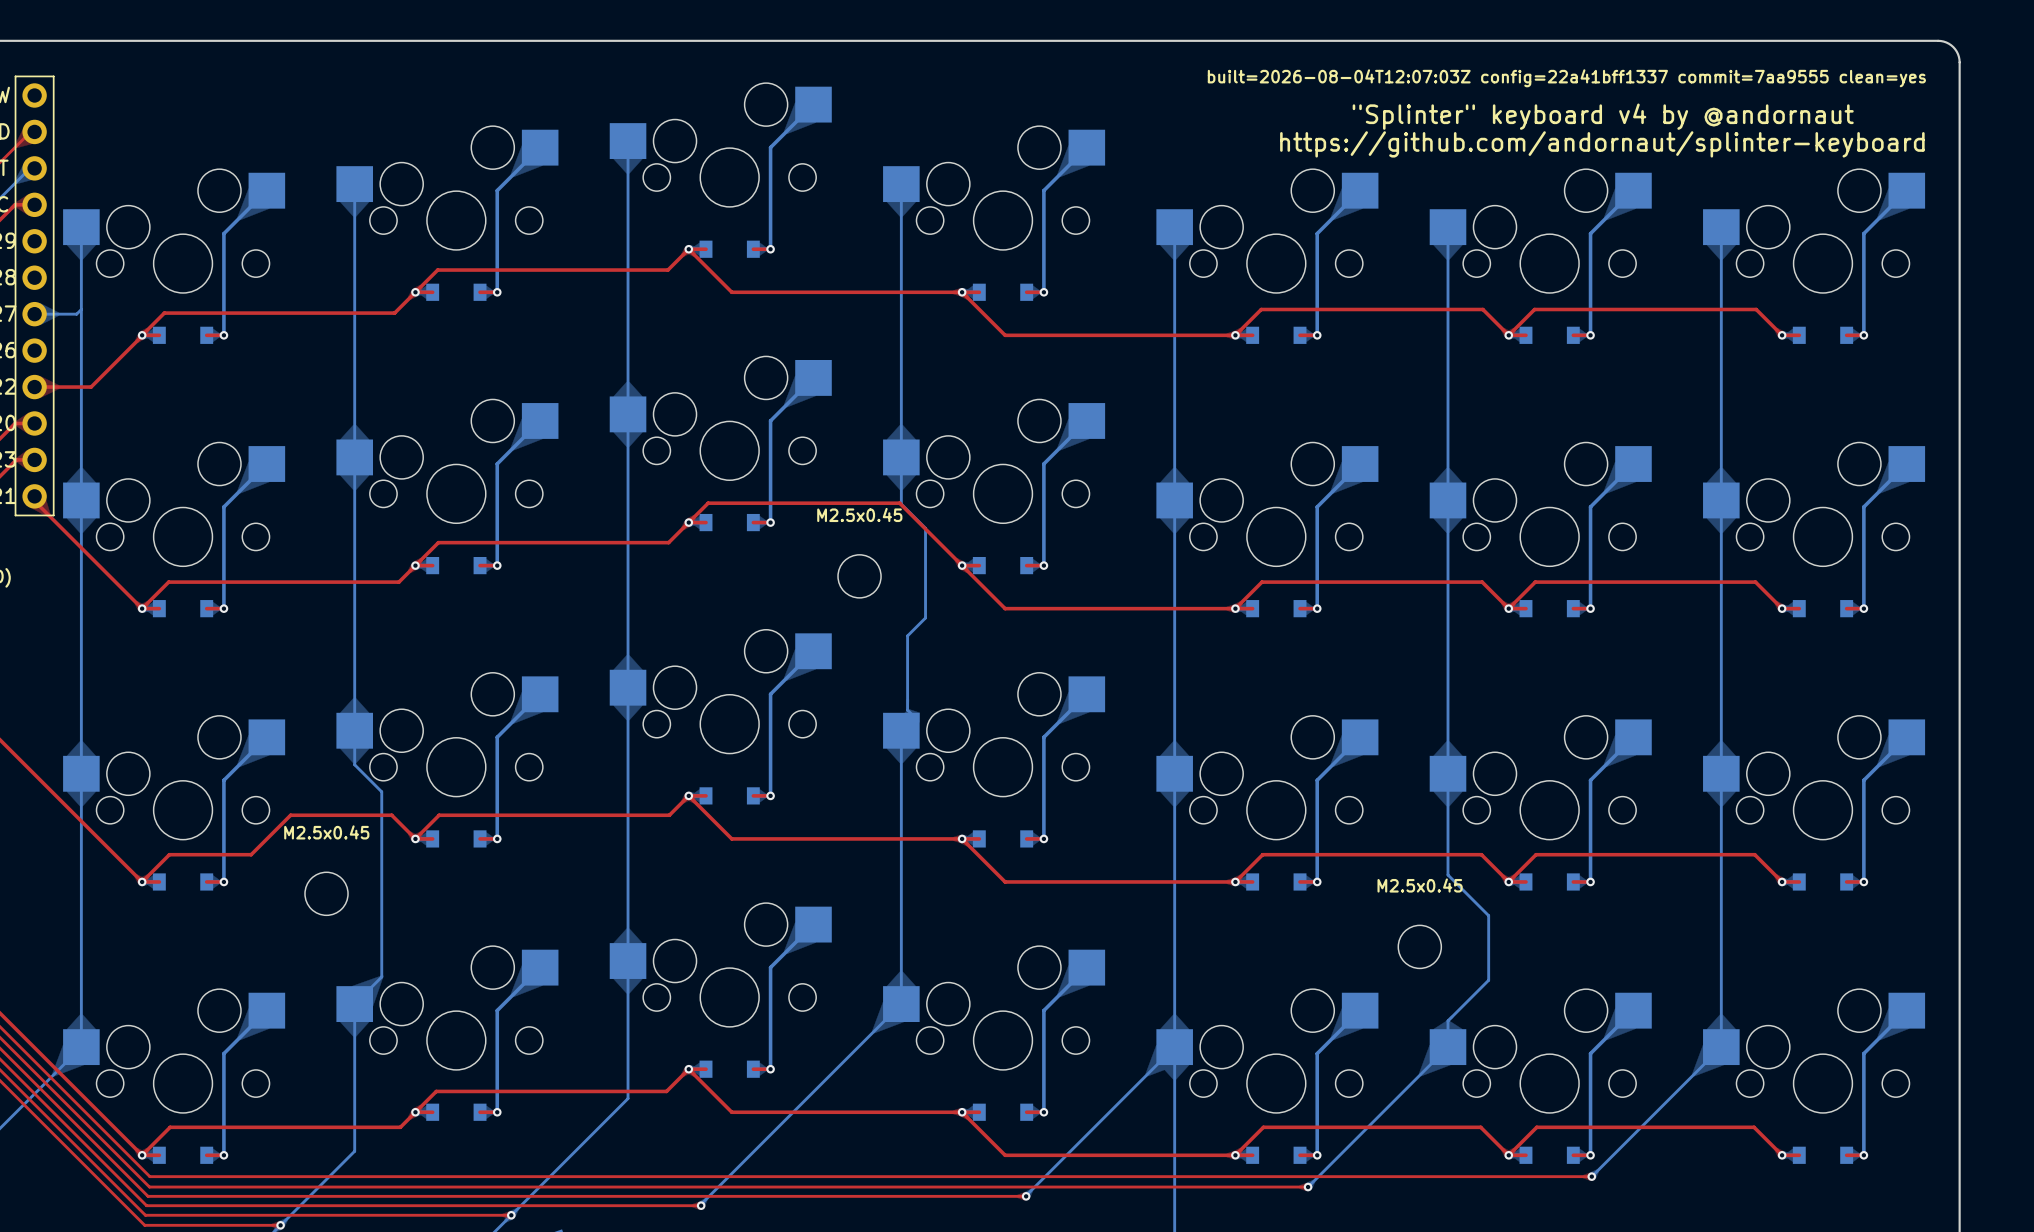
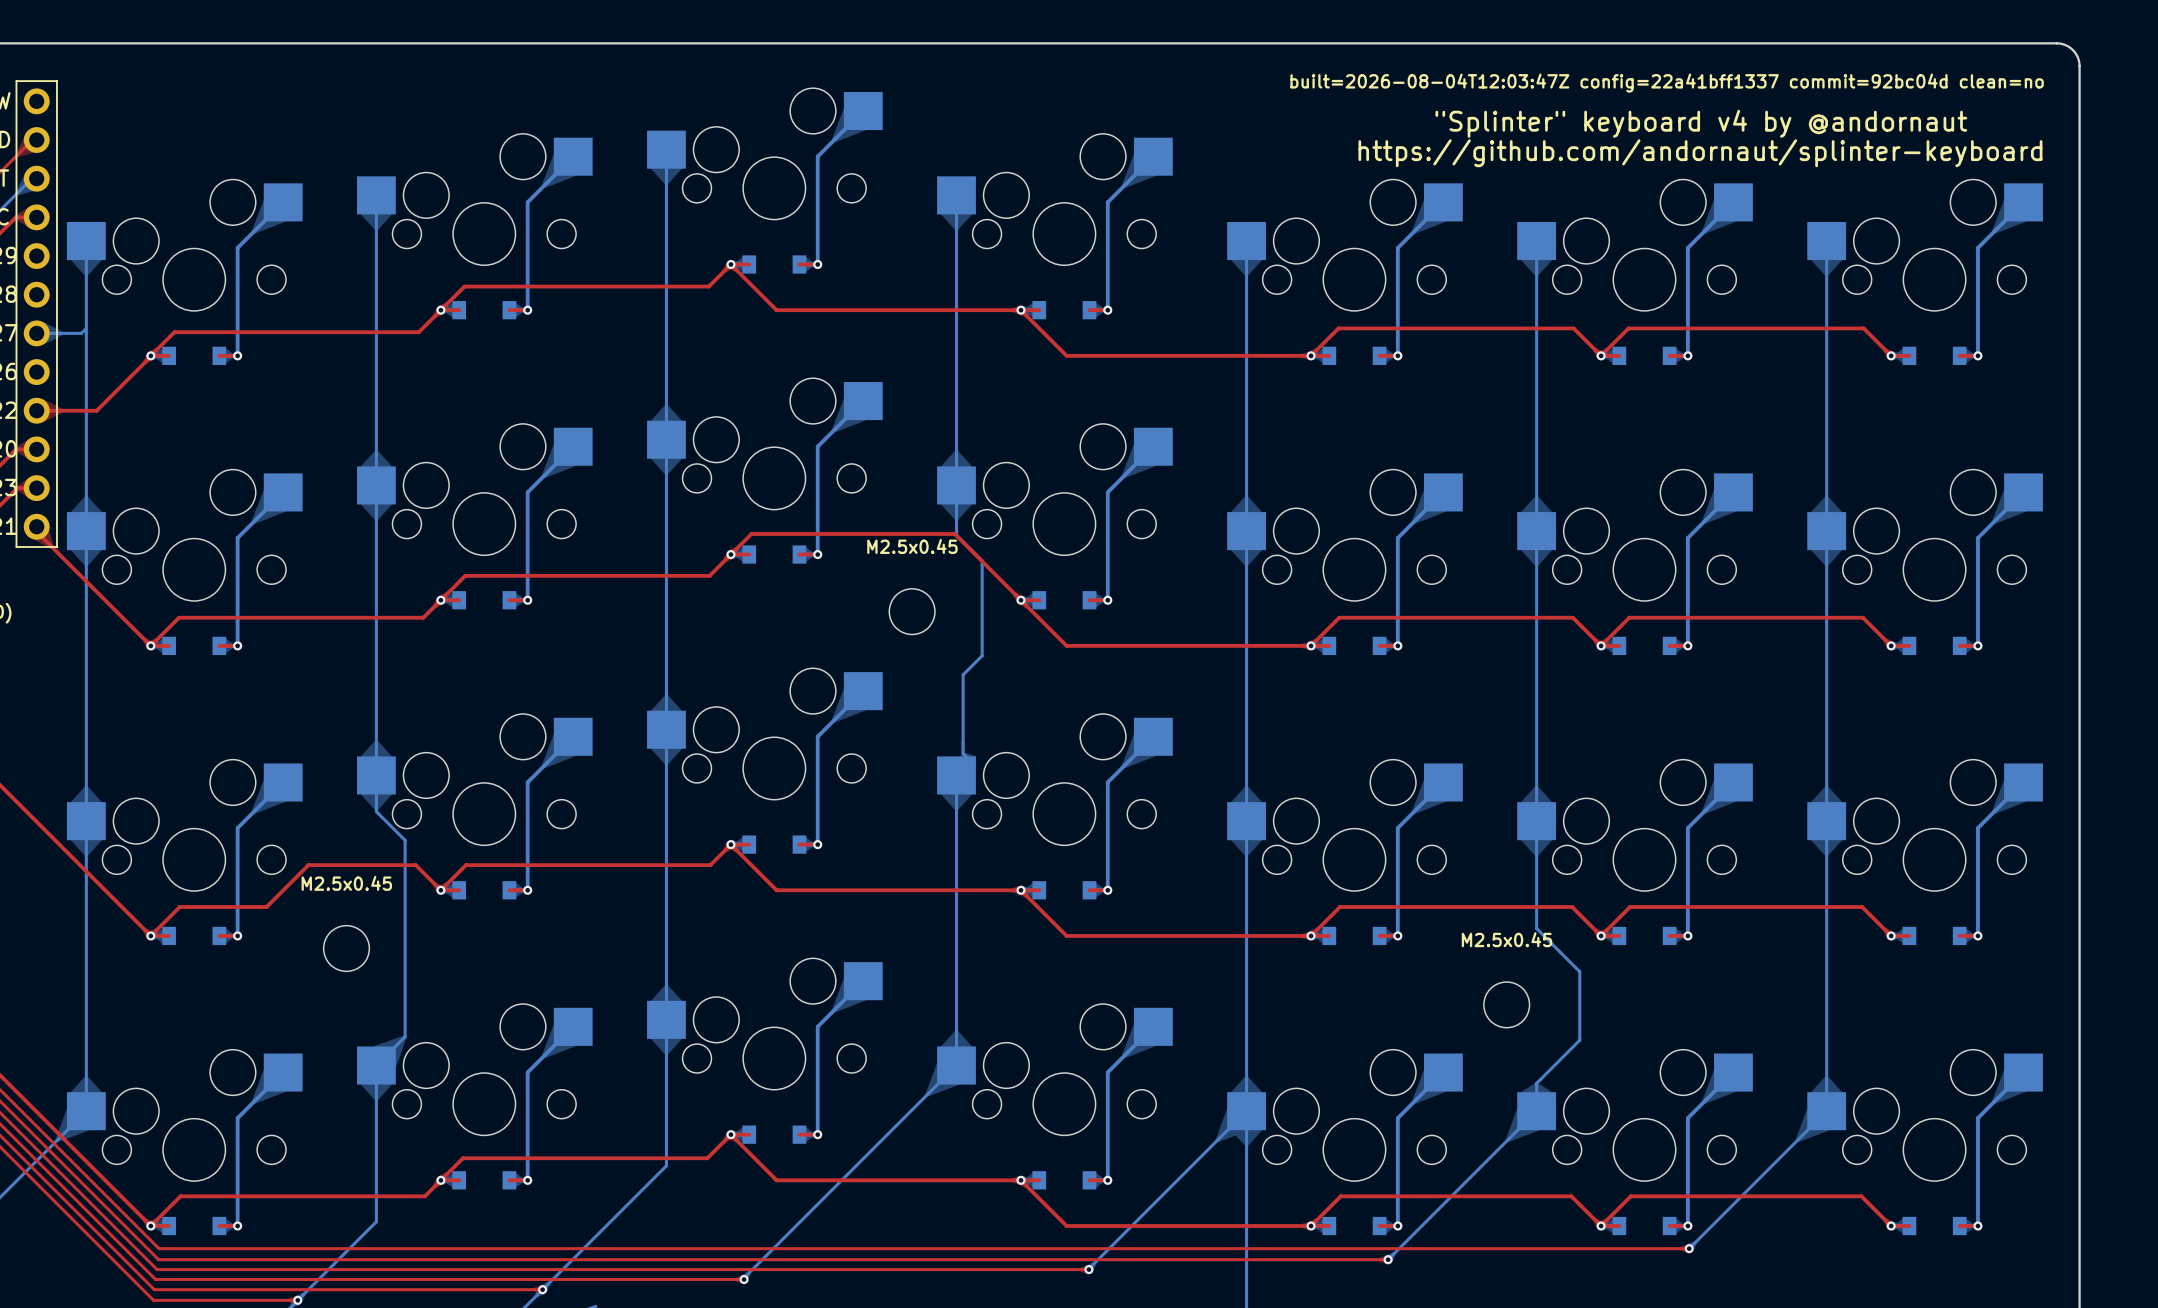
text: built=2026-08-04T12:07:03Z config=22a41bff1337 commit=7aa9555 clean=yes (1566, 78) -> built=2026-08-04T12:03:47Z config=22a41bff1337 commit=92bc04d clean=no (1667, 83)

